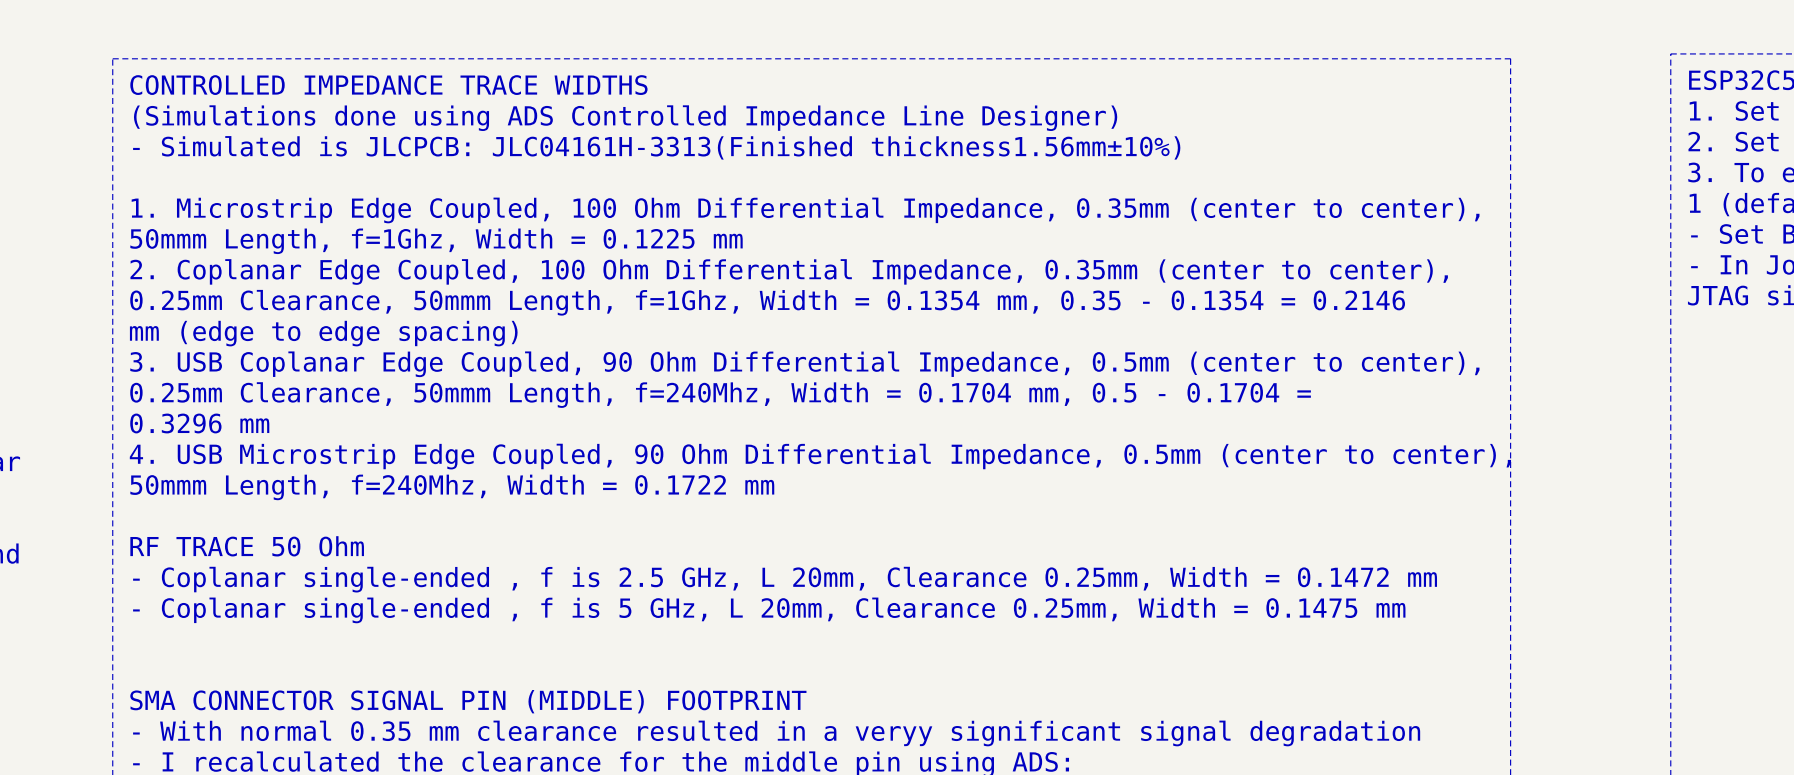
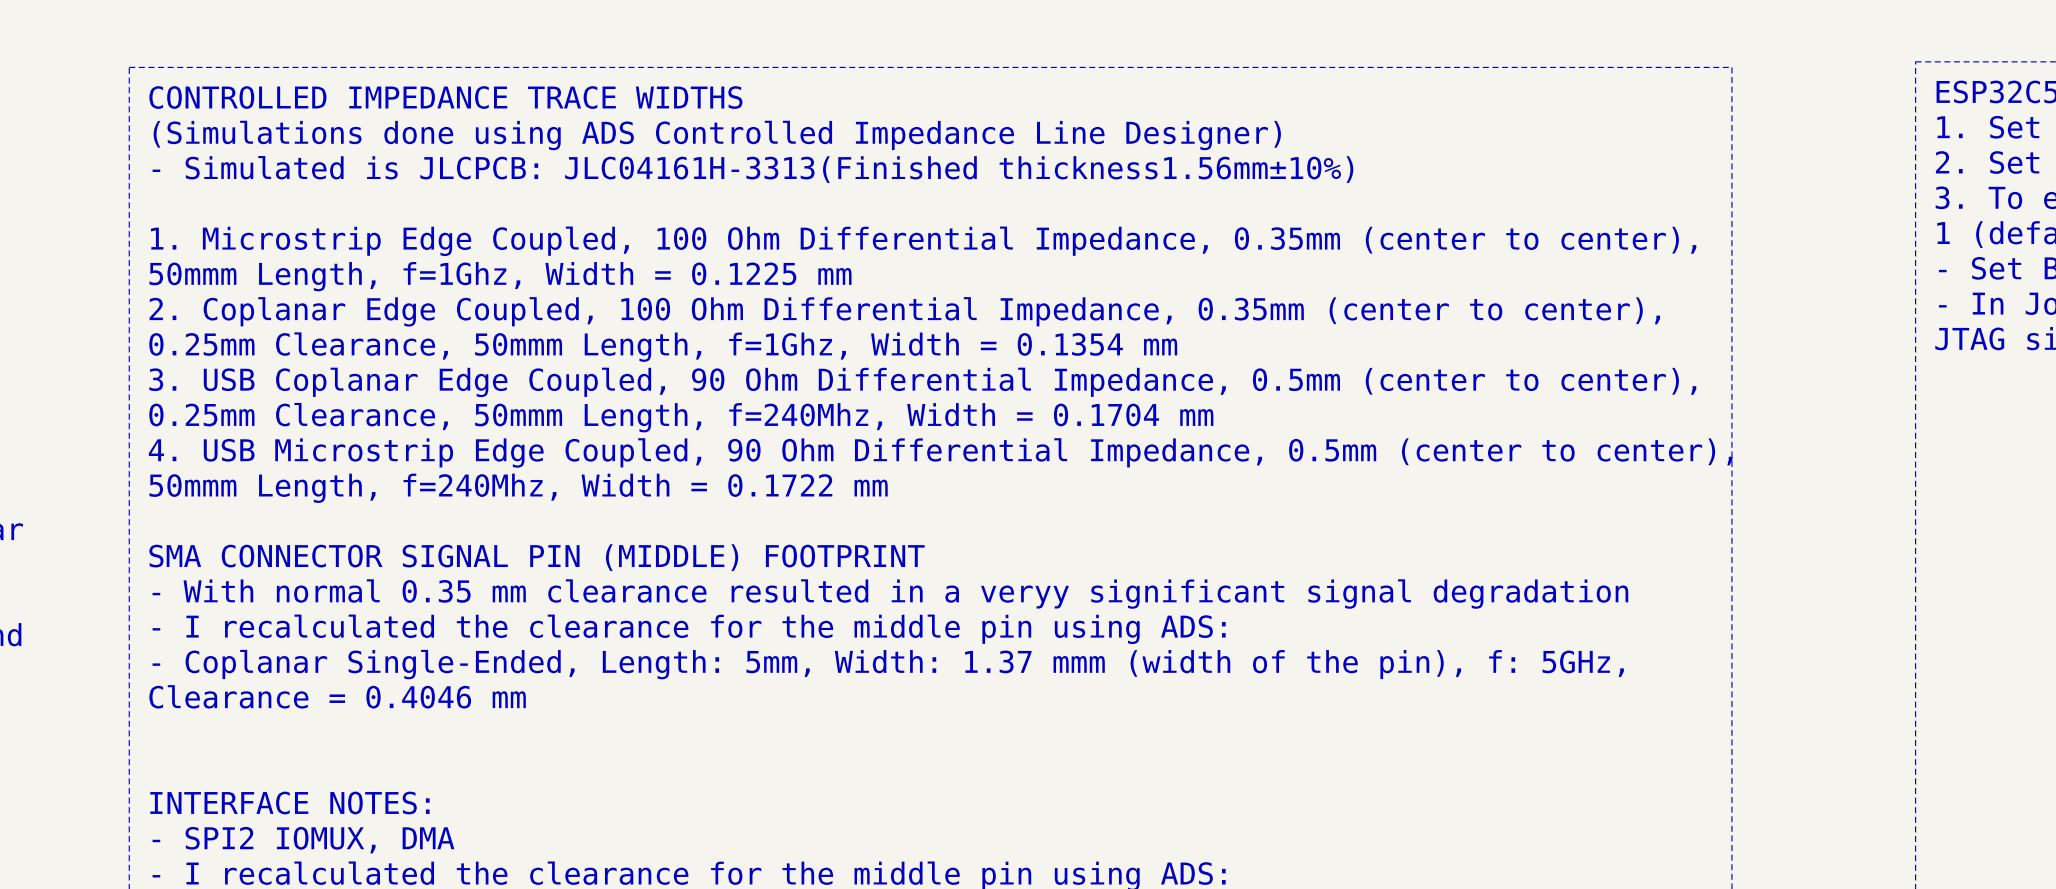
text: 0.25mm Clearance, 50mmm Length, f=1Ghz, Width = 0.1354 mm, 0.35 - 0.1354 = 0.2146 (767, 302) -> 0.25mm Clearance, 50mmm Length, f=1Ghz, Width = 0.1354 mm (663, 347)
text: mm (edge to edge spacing) (323, 333) -> 3. USB Coplanar Edge Coupled, 90 Ohm Differential Impedance, 0.5mm (center to center), (922, 382)
text: 3. USB Coplanar Edge Coupled, 90 Ohm Differential Impedance, 0.5mm (center to center), (804, 364) -> 0.25mm Clearance, 50mmm Length, f=240Mhz, Width = 0.1704 mm (681, 417)
text: 0.25mm Clearance, 50mmm Length, f=240Mhz, Width = 0.1704 mm, 0.5 - 0.1704 = (720, 395) -> 4. USB Microstrip Edge Coupled, 90 Ohm Differential Impedance, 0.5mm (center to center), (940, 452)
text: 0.3296 mm (199, 423) -> 50mmm Length, f=240Mhz, Width = 0.1722 mm (518, 488)
text: 4. USB Microstrip Edge Coupled, 90 Ohm Differential Impedance, 0.5mm (center to center), (820, 456) -> none
text: 50mmm Length, f=240Mhz, Width = 0.1722 mm (452, 487) -> SMA CONNECTOR SIGNAL PIN (MIDDLE) FOOTPRINT (537, 557)
text: none -> - With normal 0.35 mm clearance resulted in a veryy significant signal degradation (890, 594)
text: RF TRACE 50 Ohm (247, 546) -> - I recalculated the clearance for the middle pin using ADS: (689, 629)
text: - Coplanar single-ended , f is 2.5 GHz, L 20mm, Clearance 0.25mm, Width = 0.1472 mm (785, 579) -> - Coplanar Single-Ended, Length: 5mm, Width: 1.37 mmm (width of the pin), f: 5GHz, (888, 664)
text: - Coplanar single-ended , f is 5 GHz, L 20mm, Clearance 0.25mm, Width = 0.1475 mm (769, 610) -> Clearance = 0.4046 mm (337, 696)
text: SMA CONNECTOR SIGNAL PIN (MIDDLE) FOOTPRINT (468, 701) -> INTERFACE NOTES: (289, 803)
text: - With normal 0.35 mm clearance resulted in a veryy significant signal degradation (776, 733) -> - SPI2 IOMUX, DMA (303, 840)

